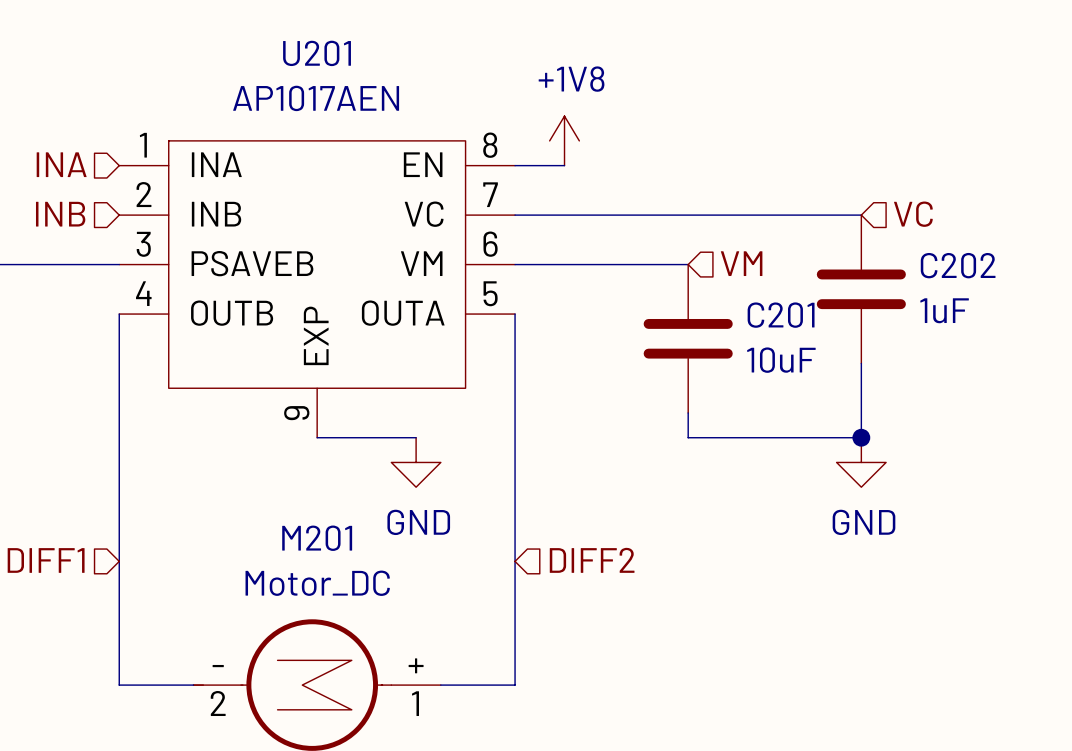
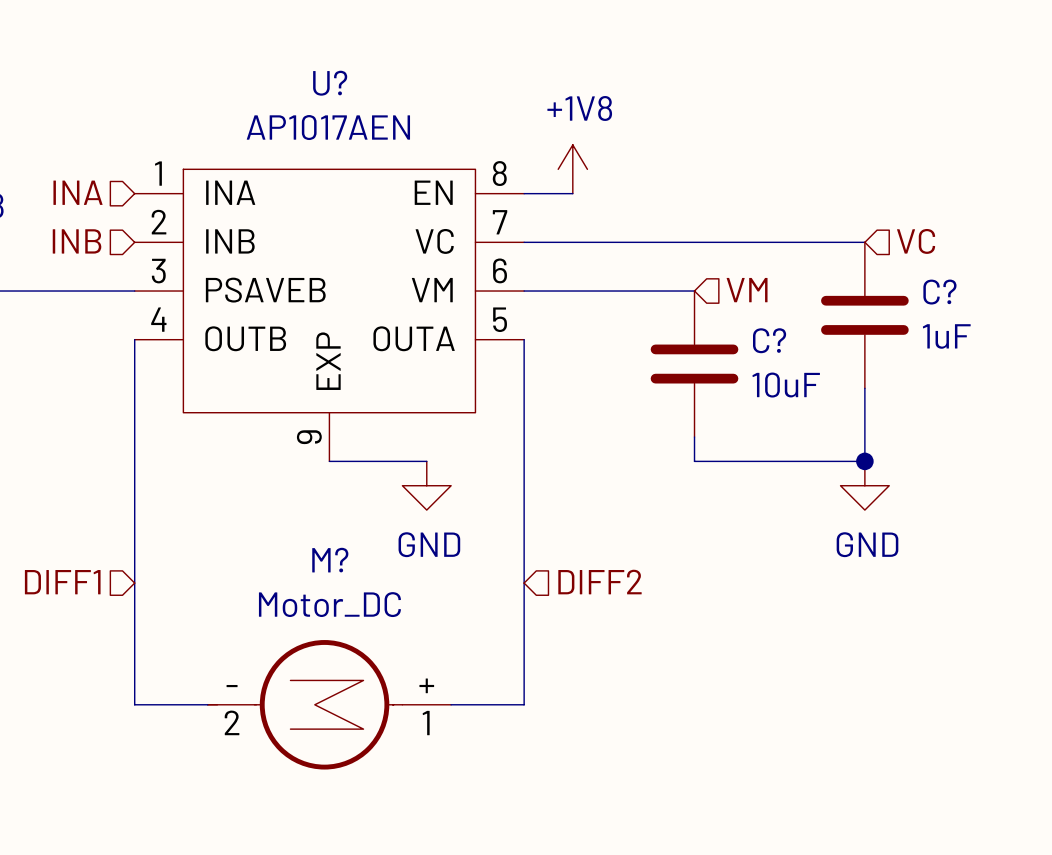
U201 name: U201 (317, 53) -> U? (330, 83)
C202 name: C202 (958, 265) -> C? (939, 292)
C201 name: C201 (781, 315) -> C? (769, 340)
M201 name: M201 (317, 538) -> M? (330, 560)

